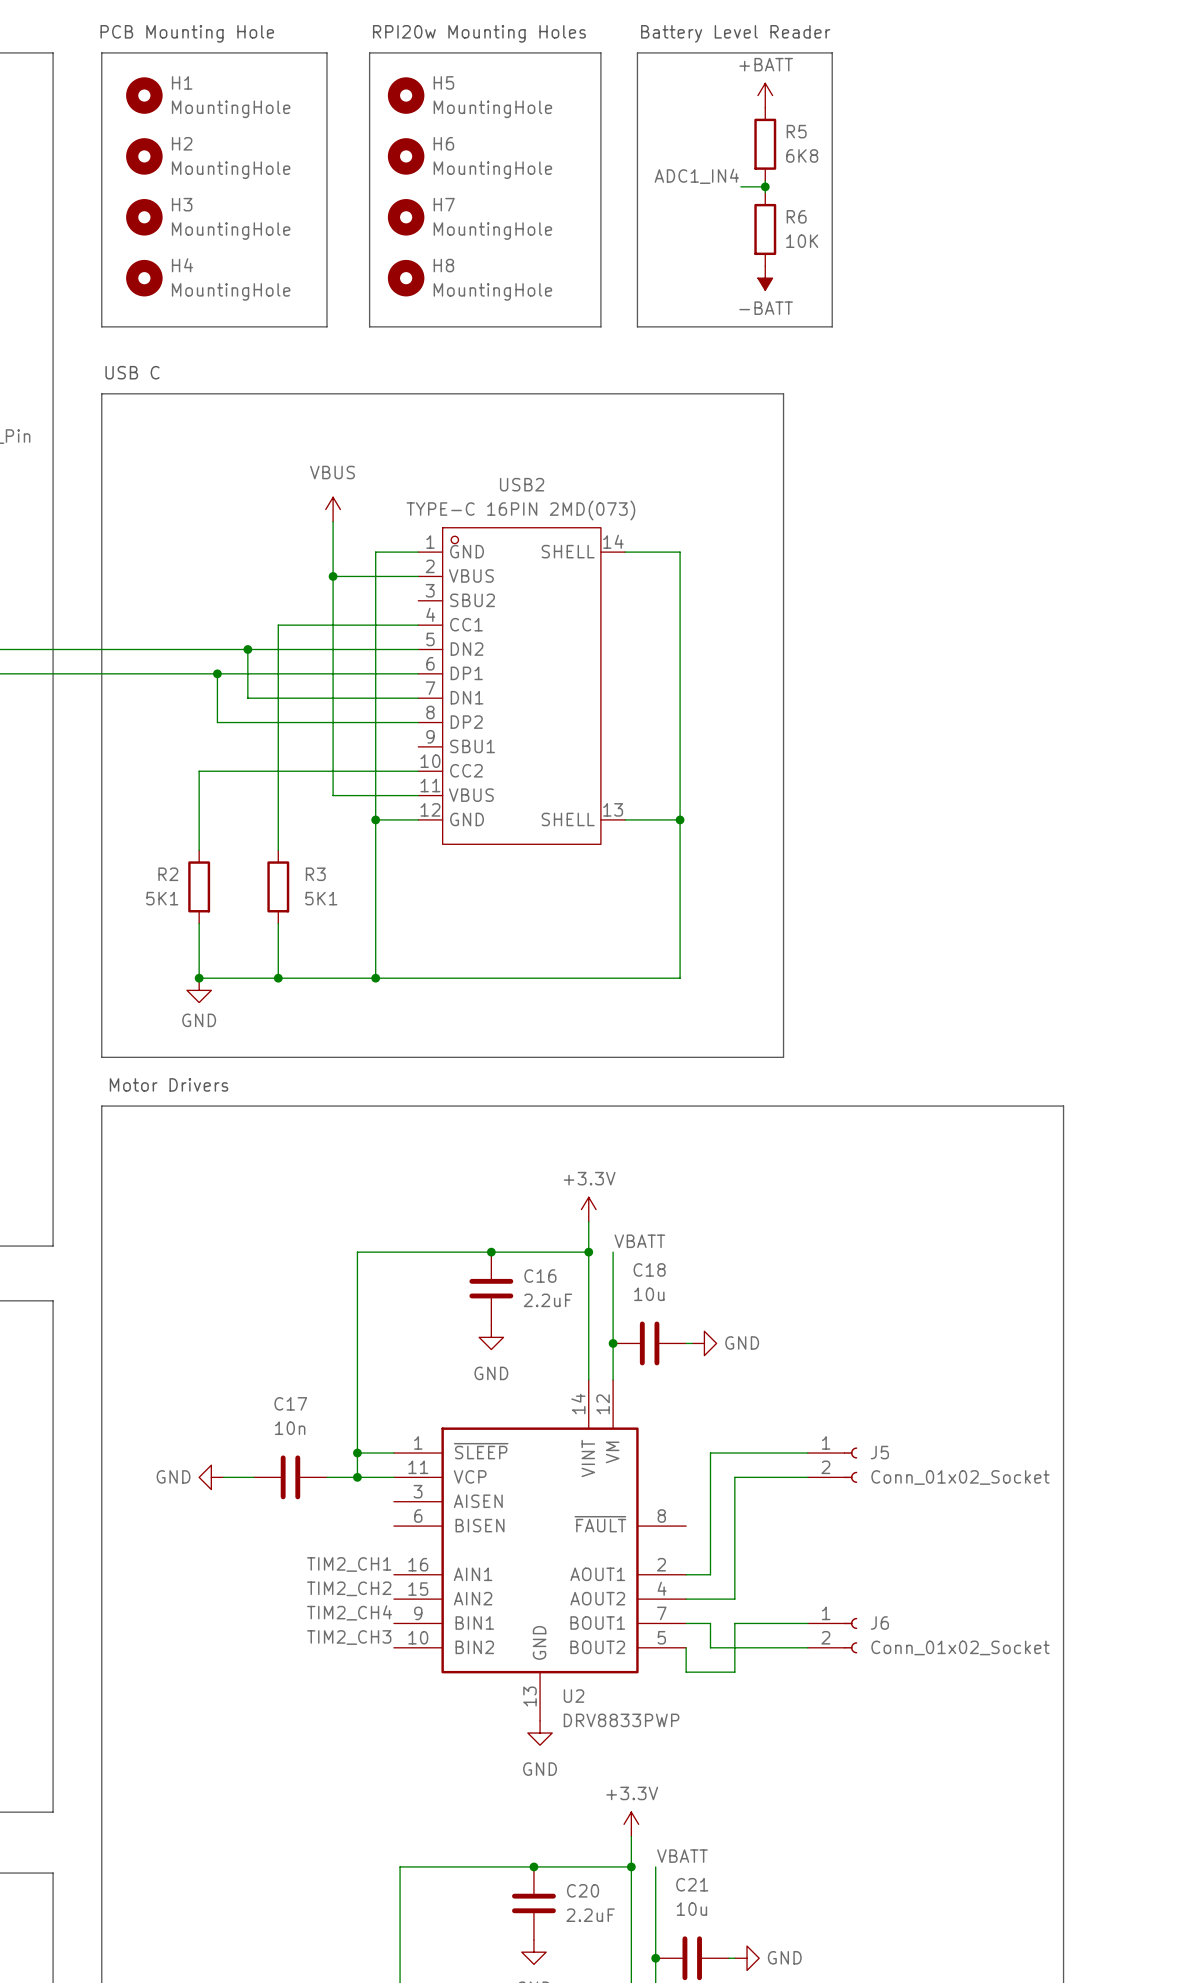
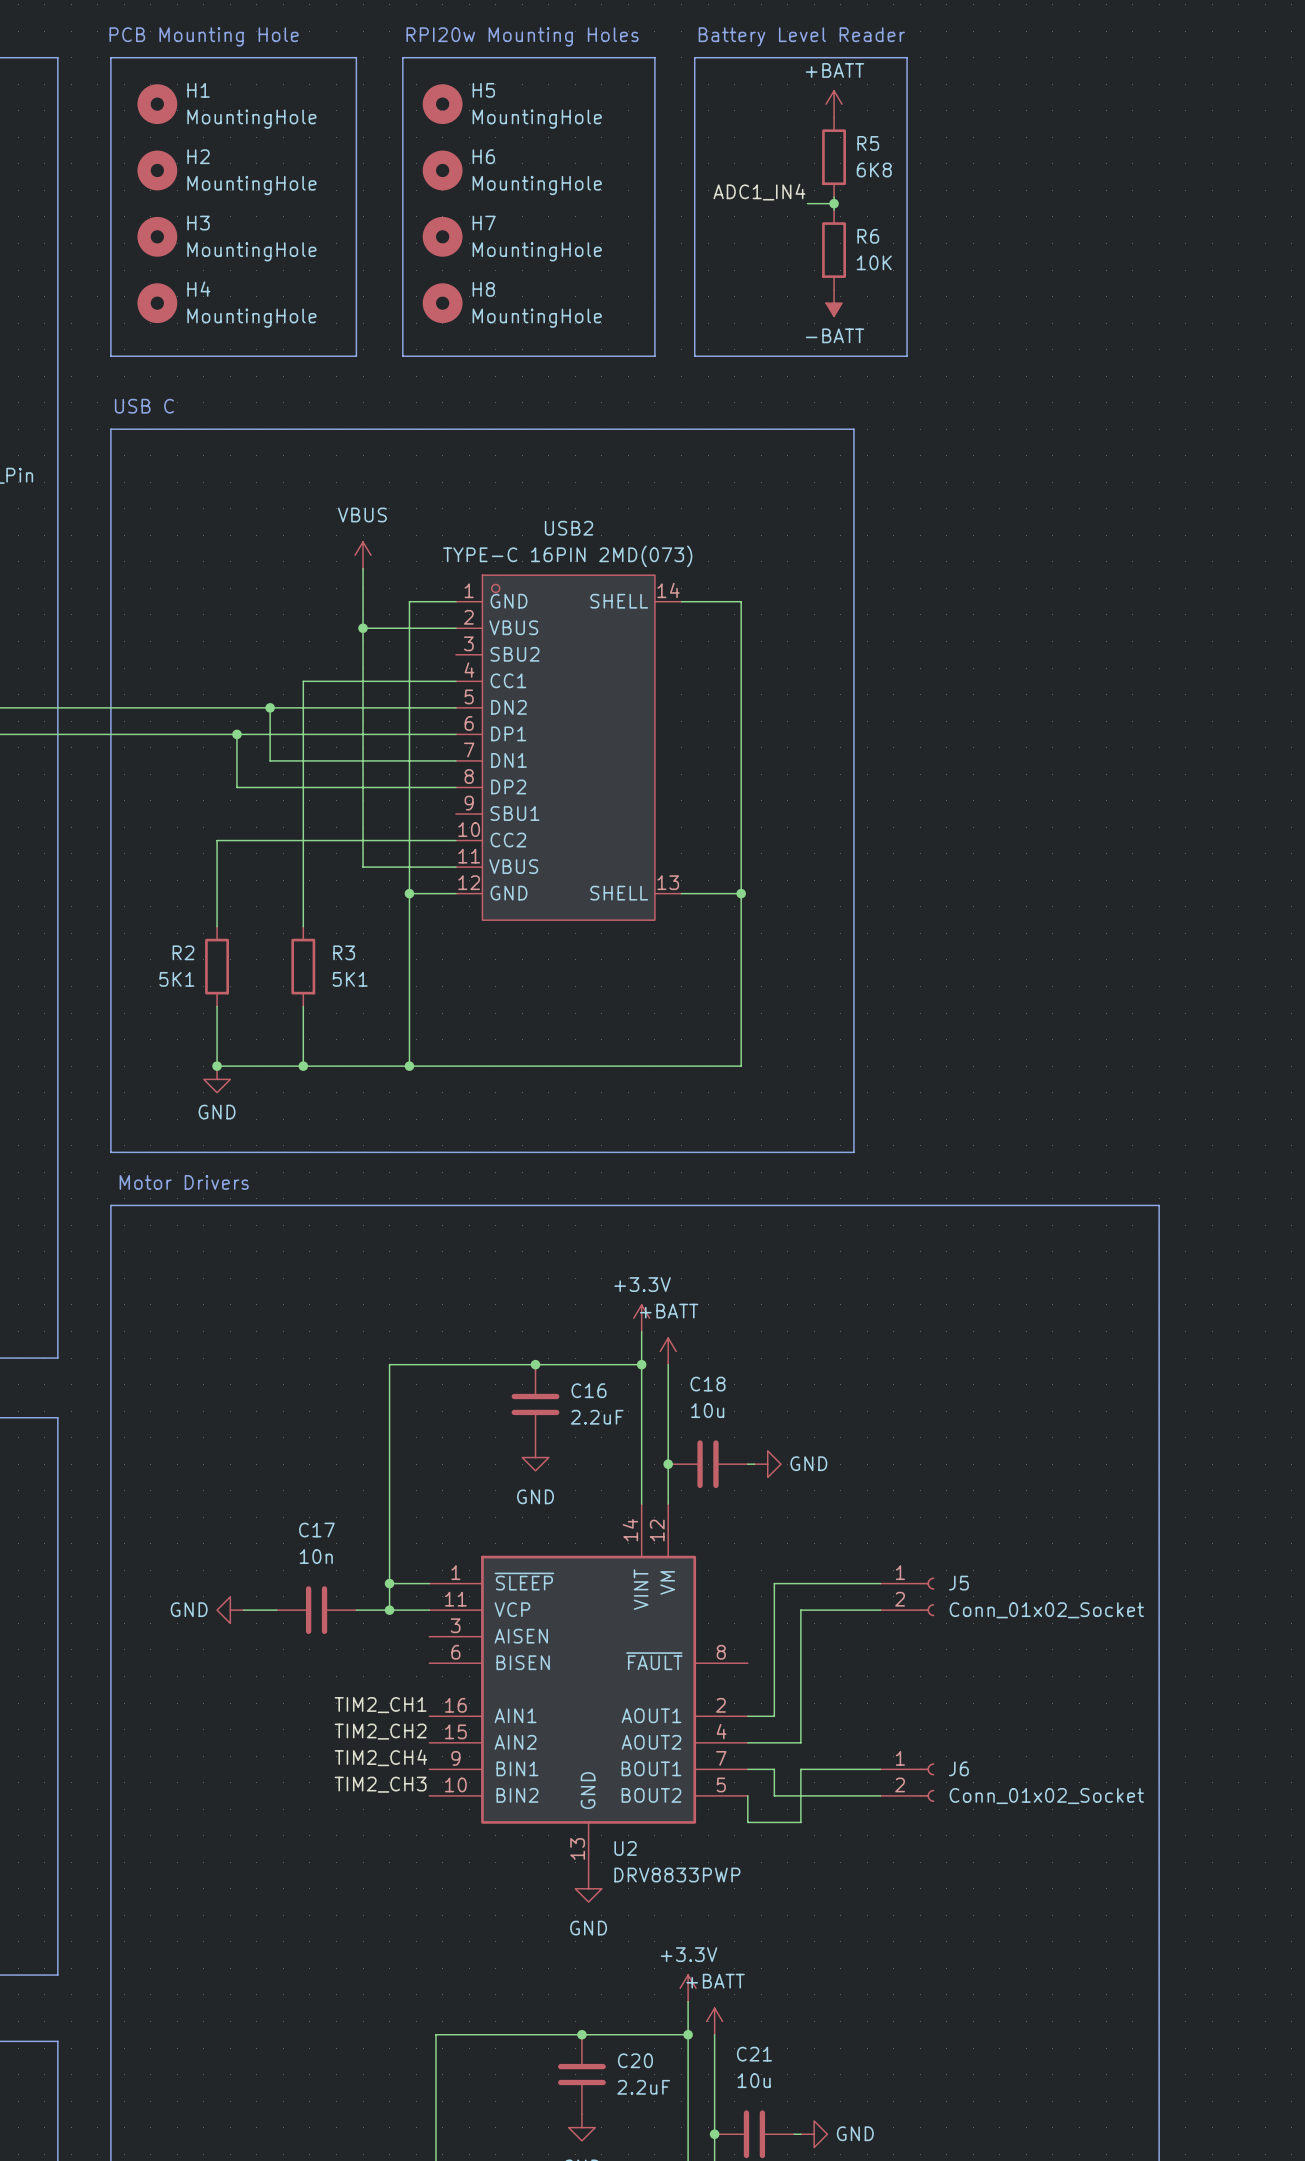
power symbol: none -> +BATT (668, 1351)
label: VBATT (639, 1241) -> none
power symbol: none -> +BATT (714, 2021)
label: VBATT (682, 1856) -> none

